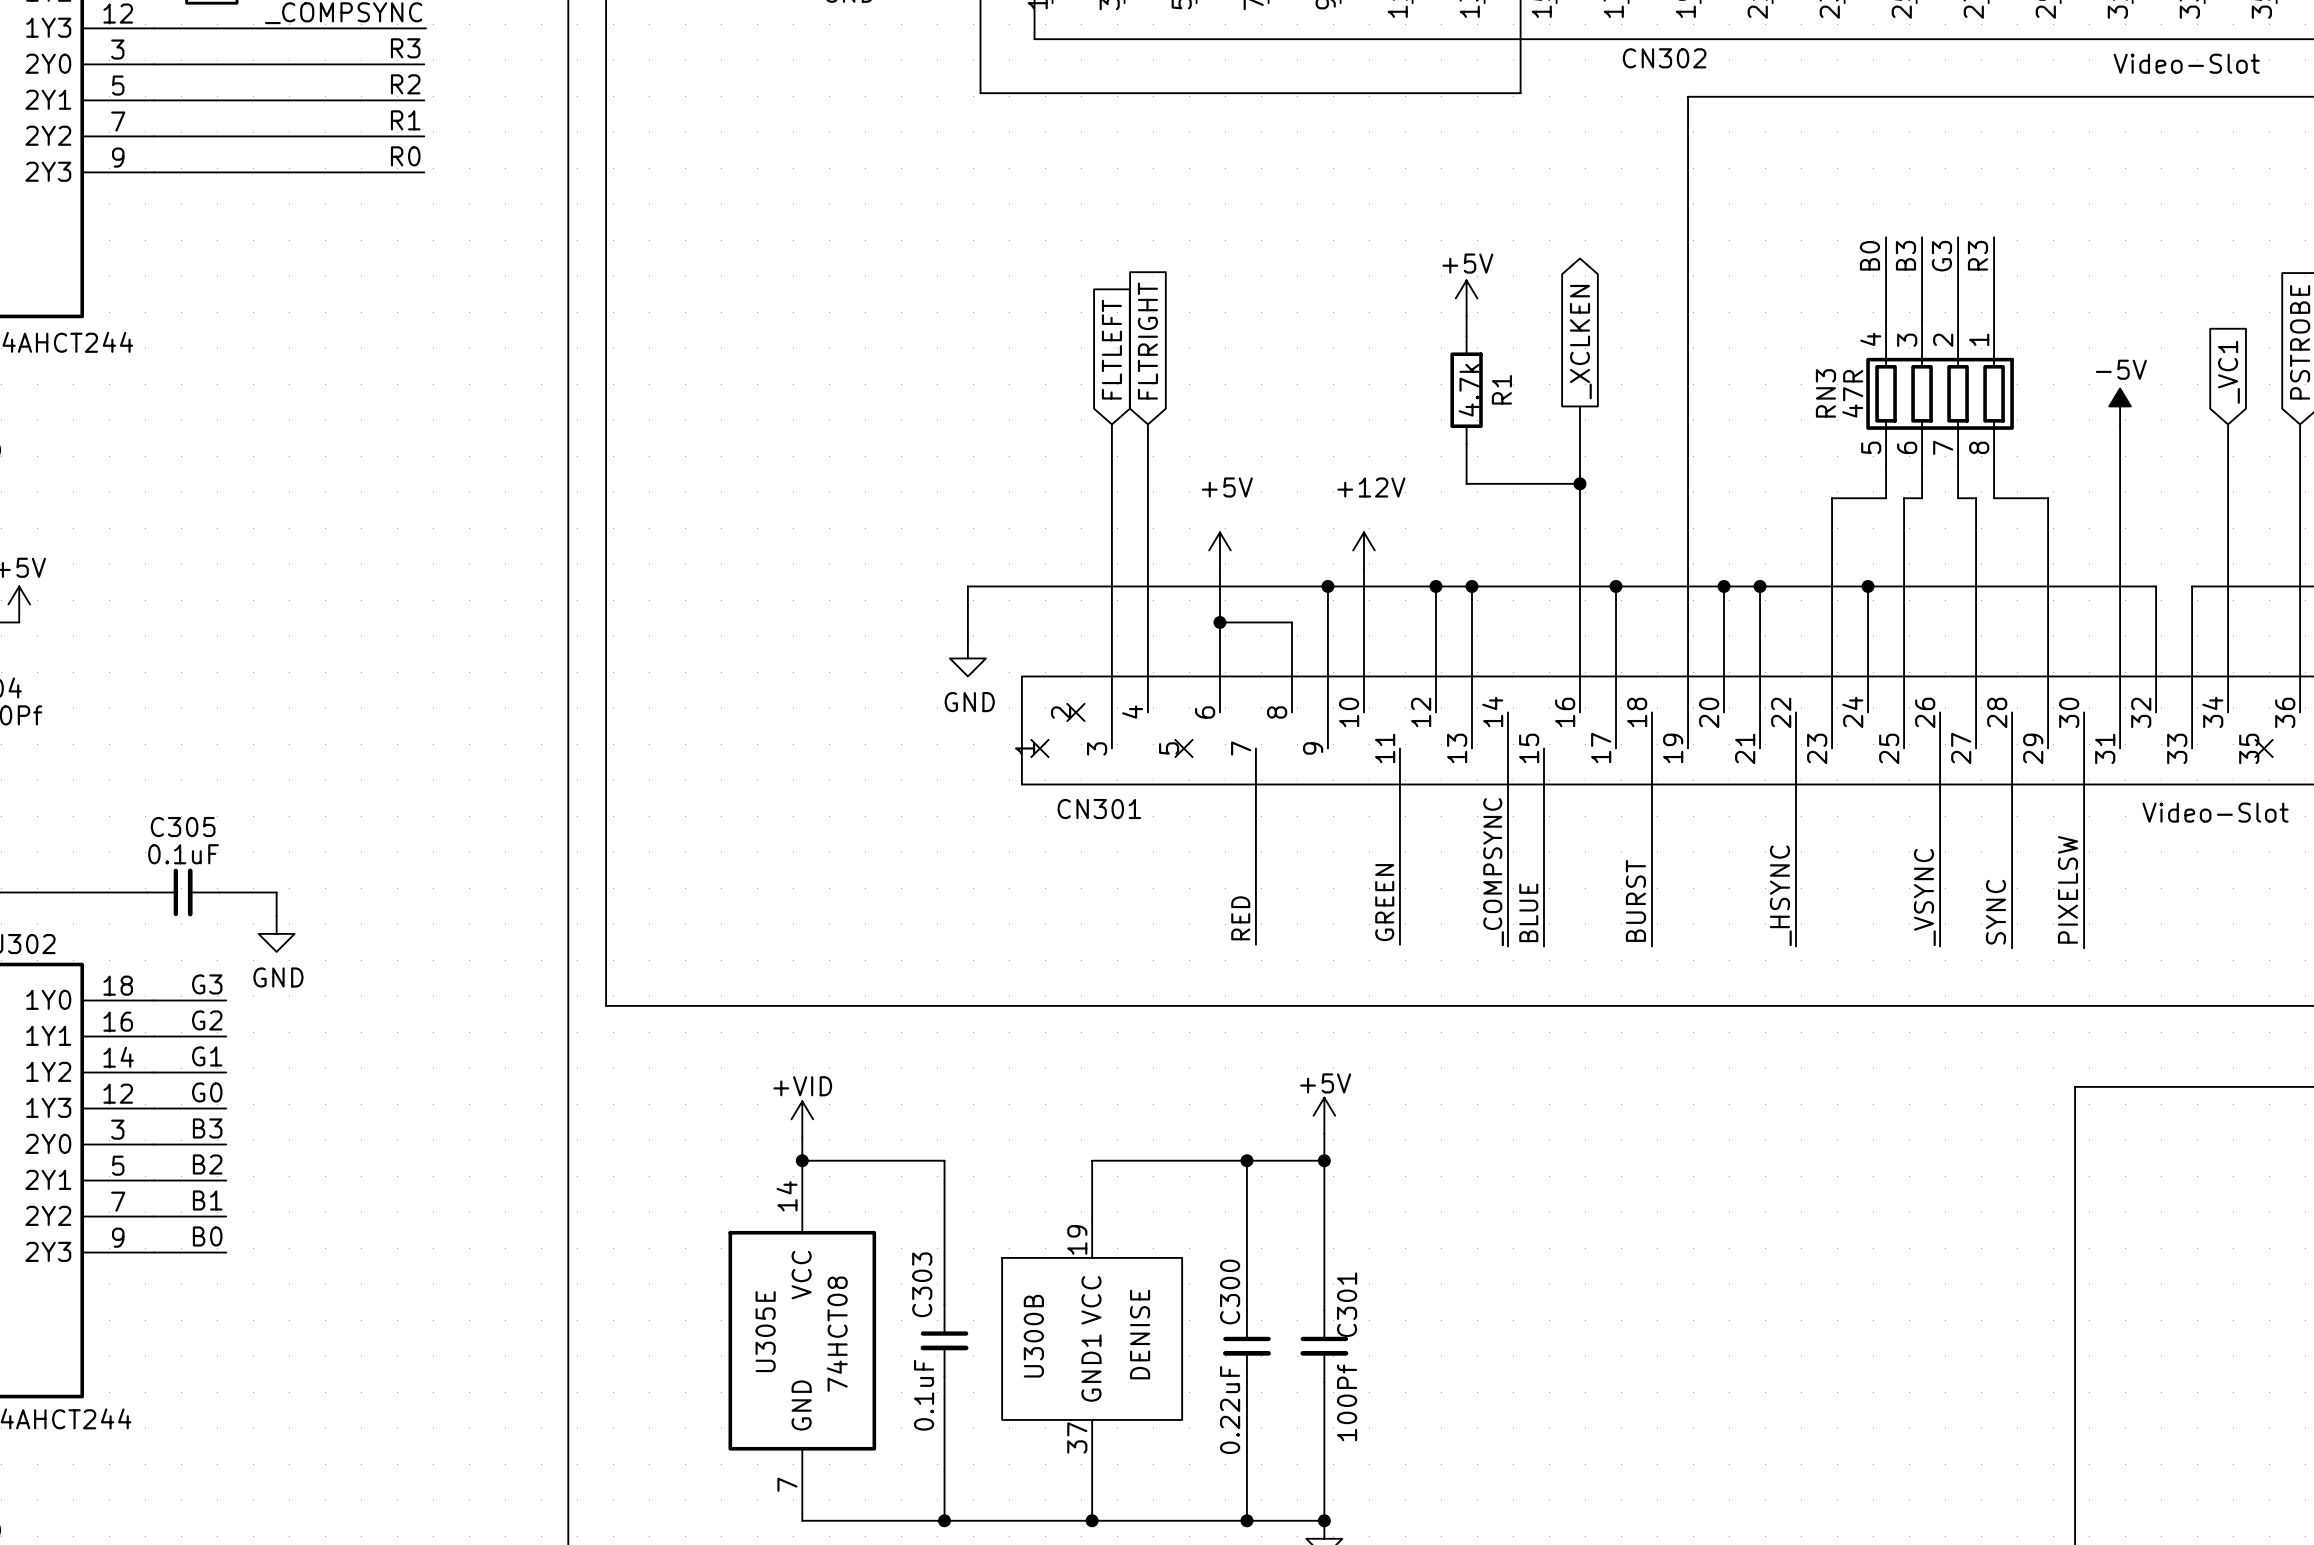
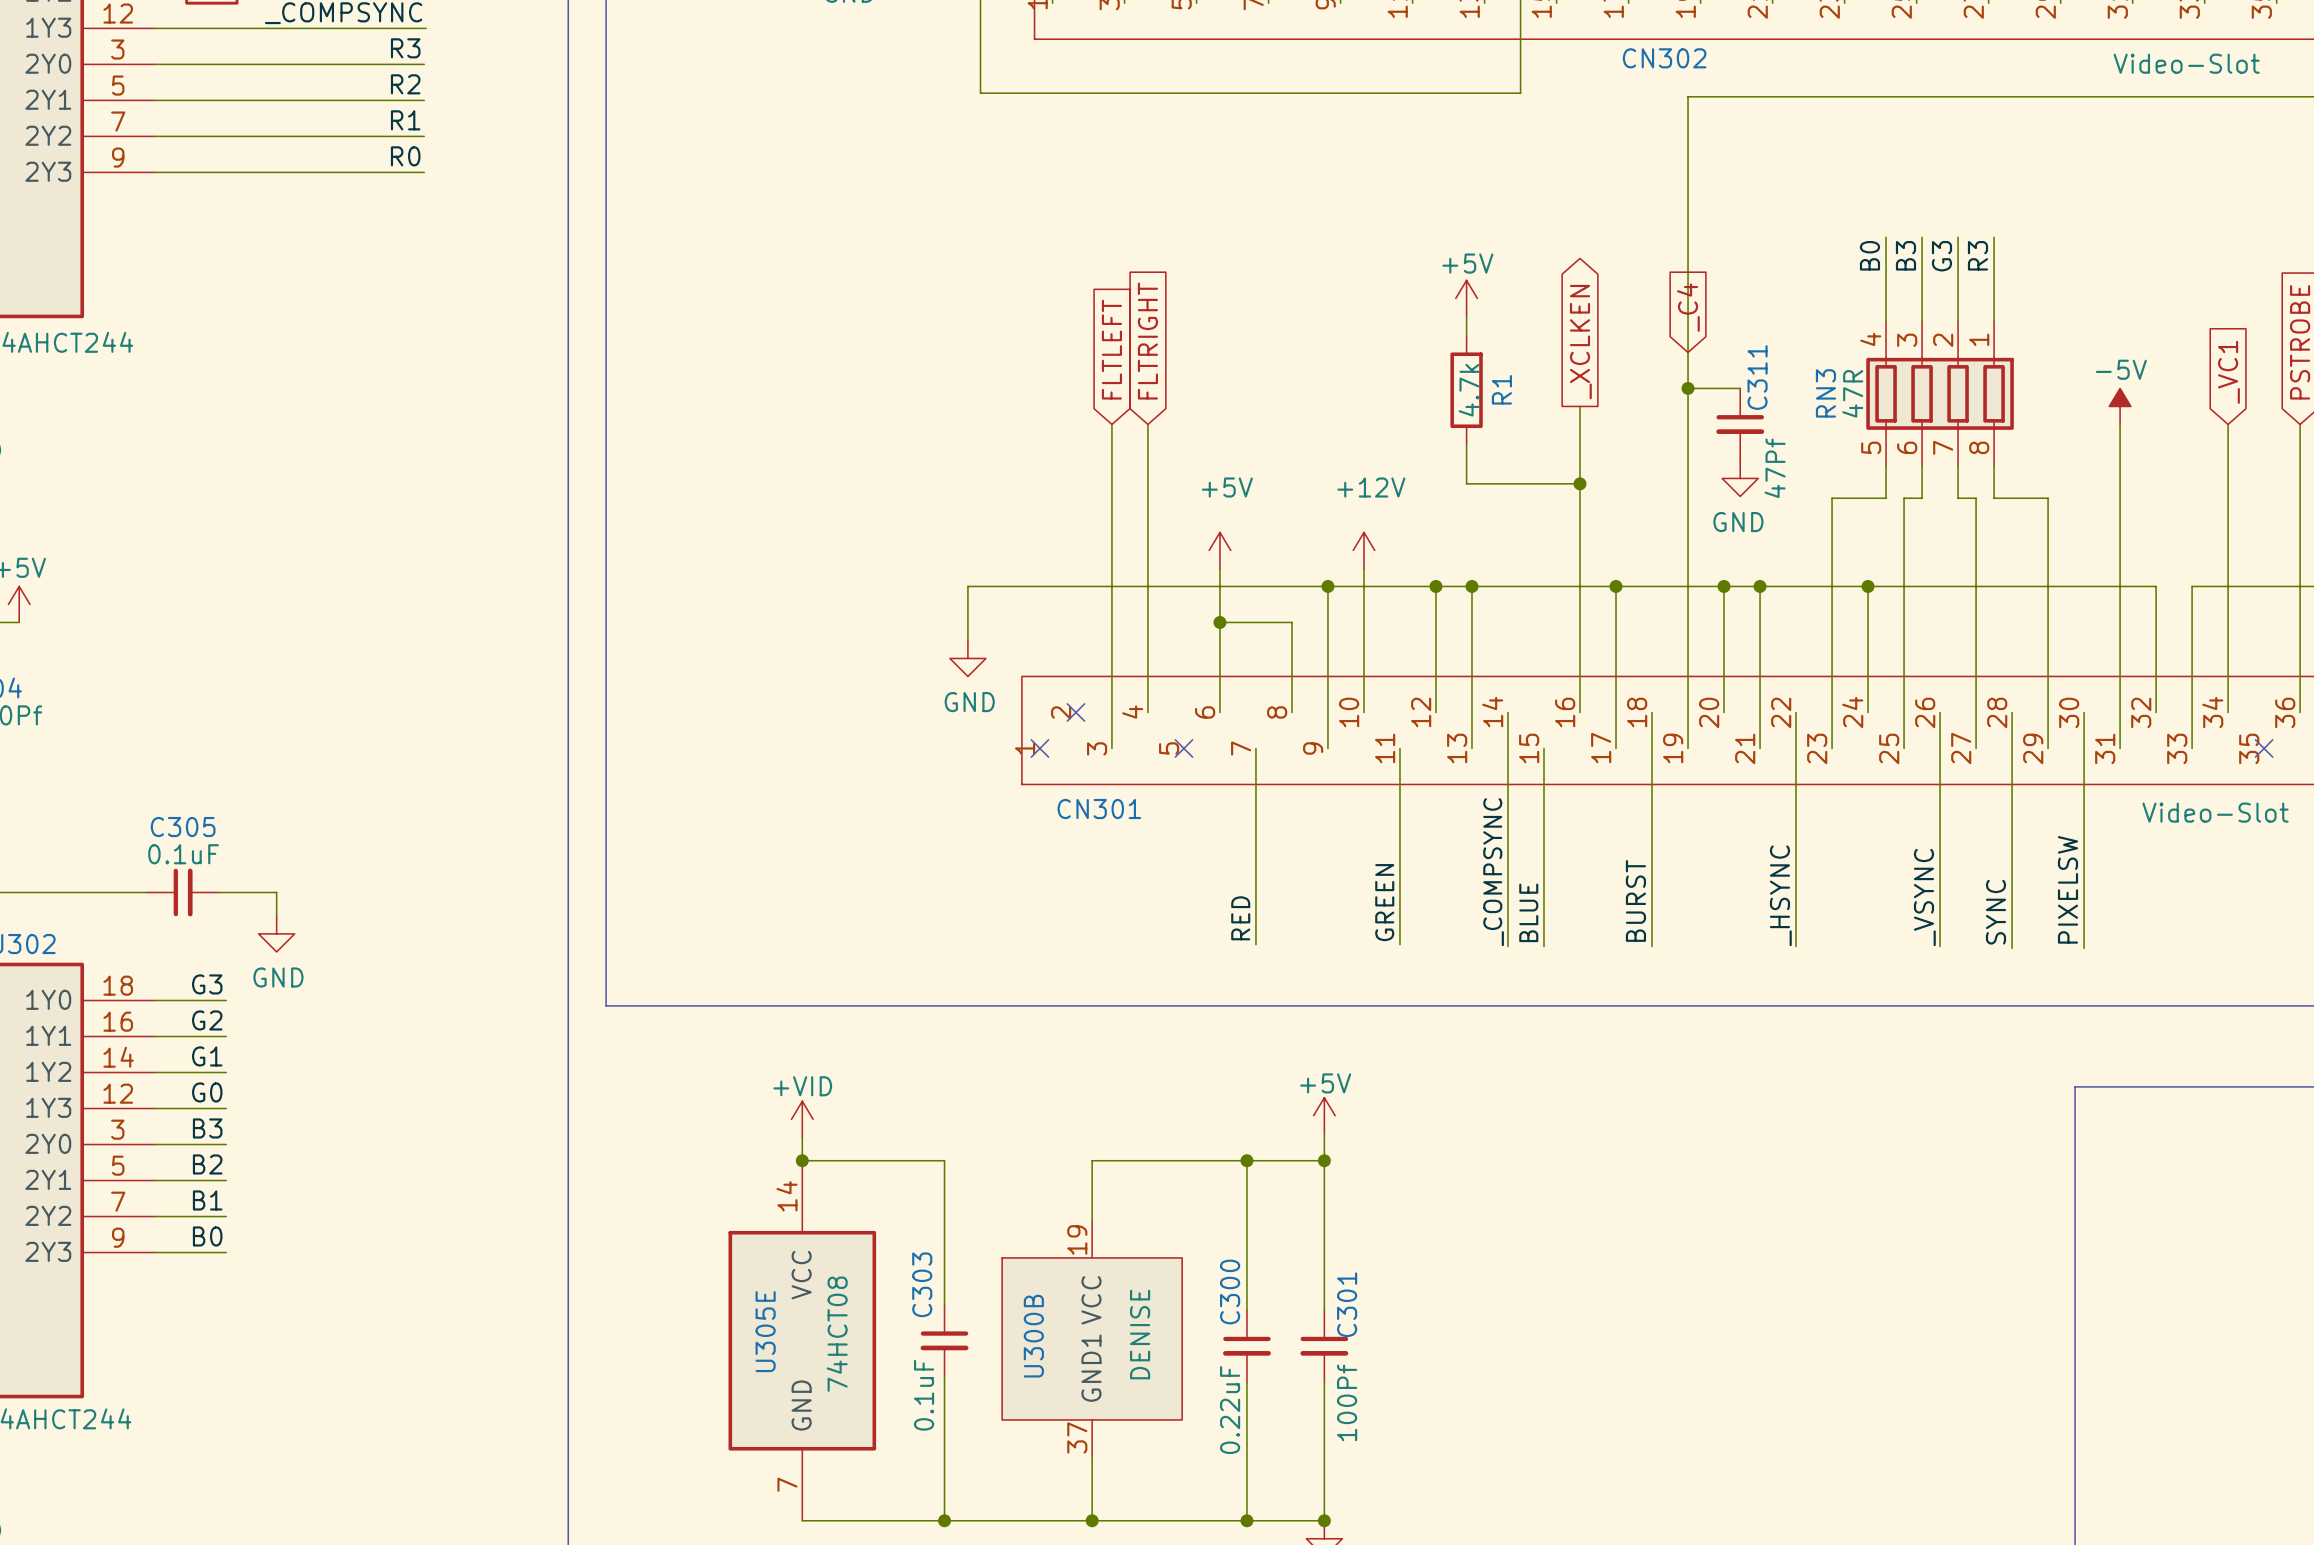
global label: none -> _C4 (1688, 307)
wire: none -> (1688, 388) (1740, 388)
junction: none -> (1688, 388)
C311: none -> 47Pf (1740, 424)
power symbol: none -> GND (1740, 478)

